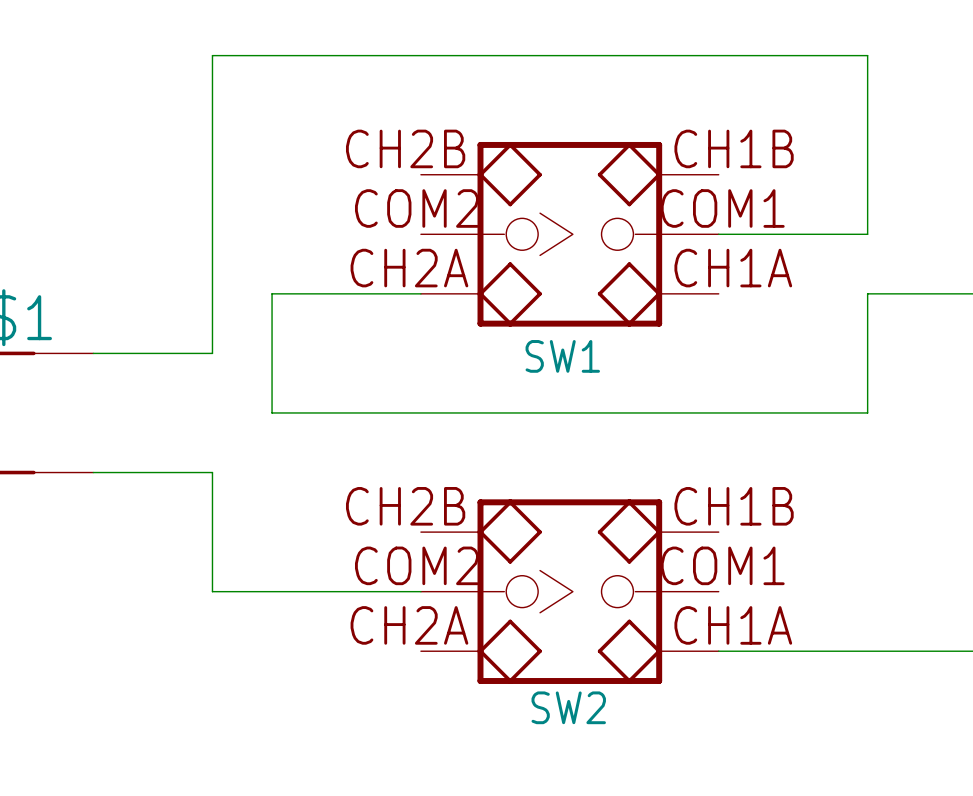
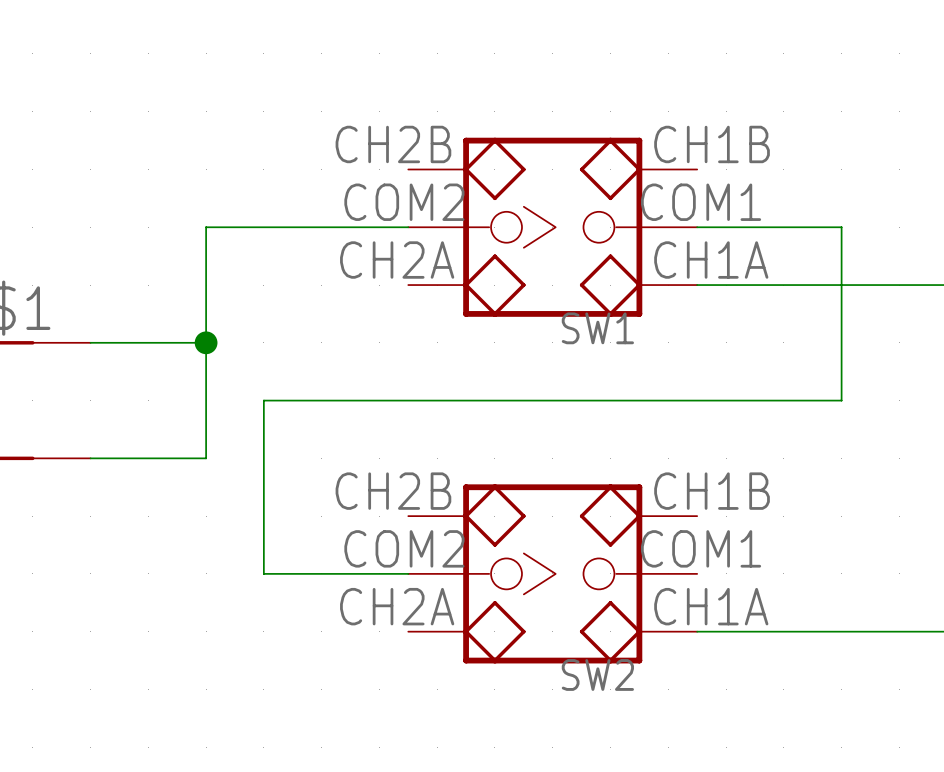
wire: (212, 234) (212, 55) (867, 55) (867, 234) -> (206, 227) (408, 227)
wire: none -> (841, 227) (841, 285) (697, 285)
wire: (420, 293) (272, 293) (272, 412) -> none
wire: none -> (206, 342) (206, 458)
junction: none -> (206, 342)
SW1 name position: SW1 (562, 356) -> SW1 (597, 328)
wire: (212, 472) (212, 591) (272, 591) -> (263, 400) (263, 573)
SW2 name position: SW2 (568, 707) -> SW2 (597, 675)

